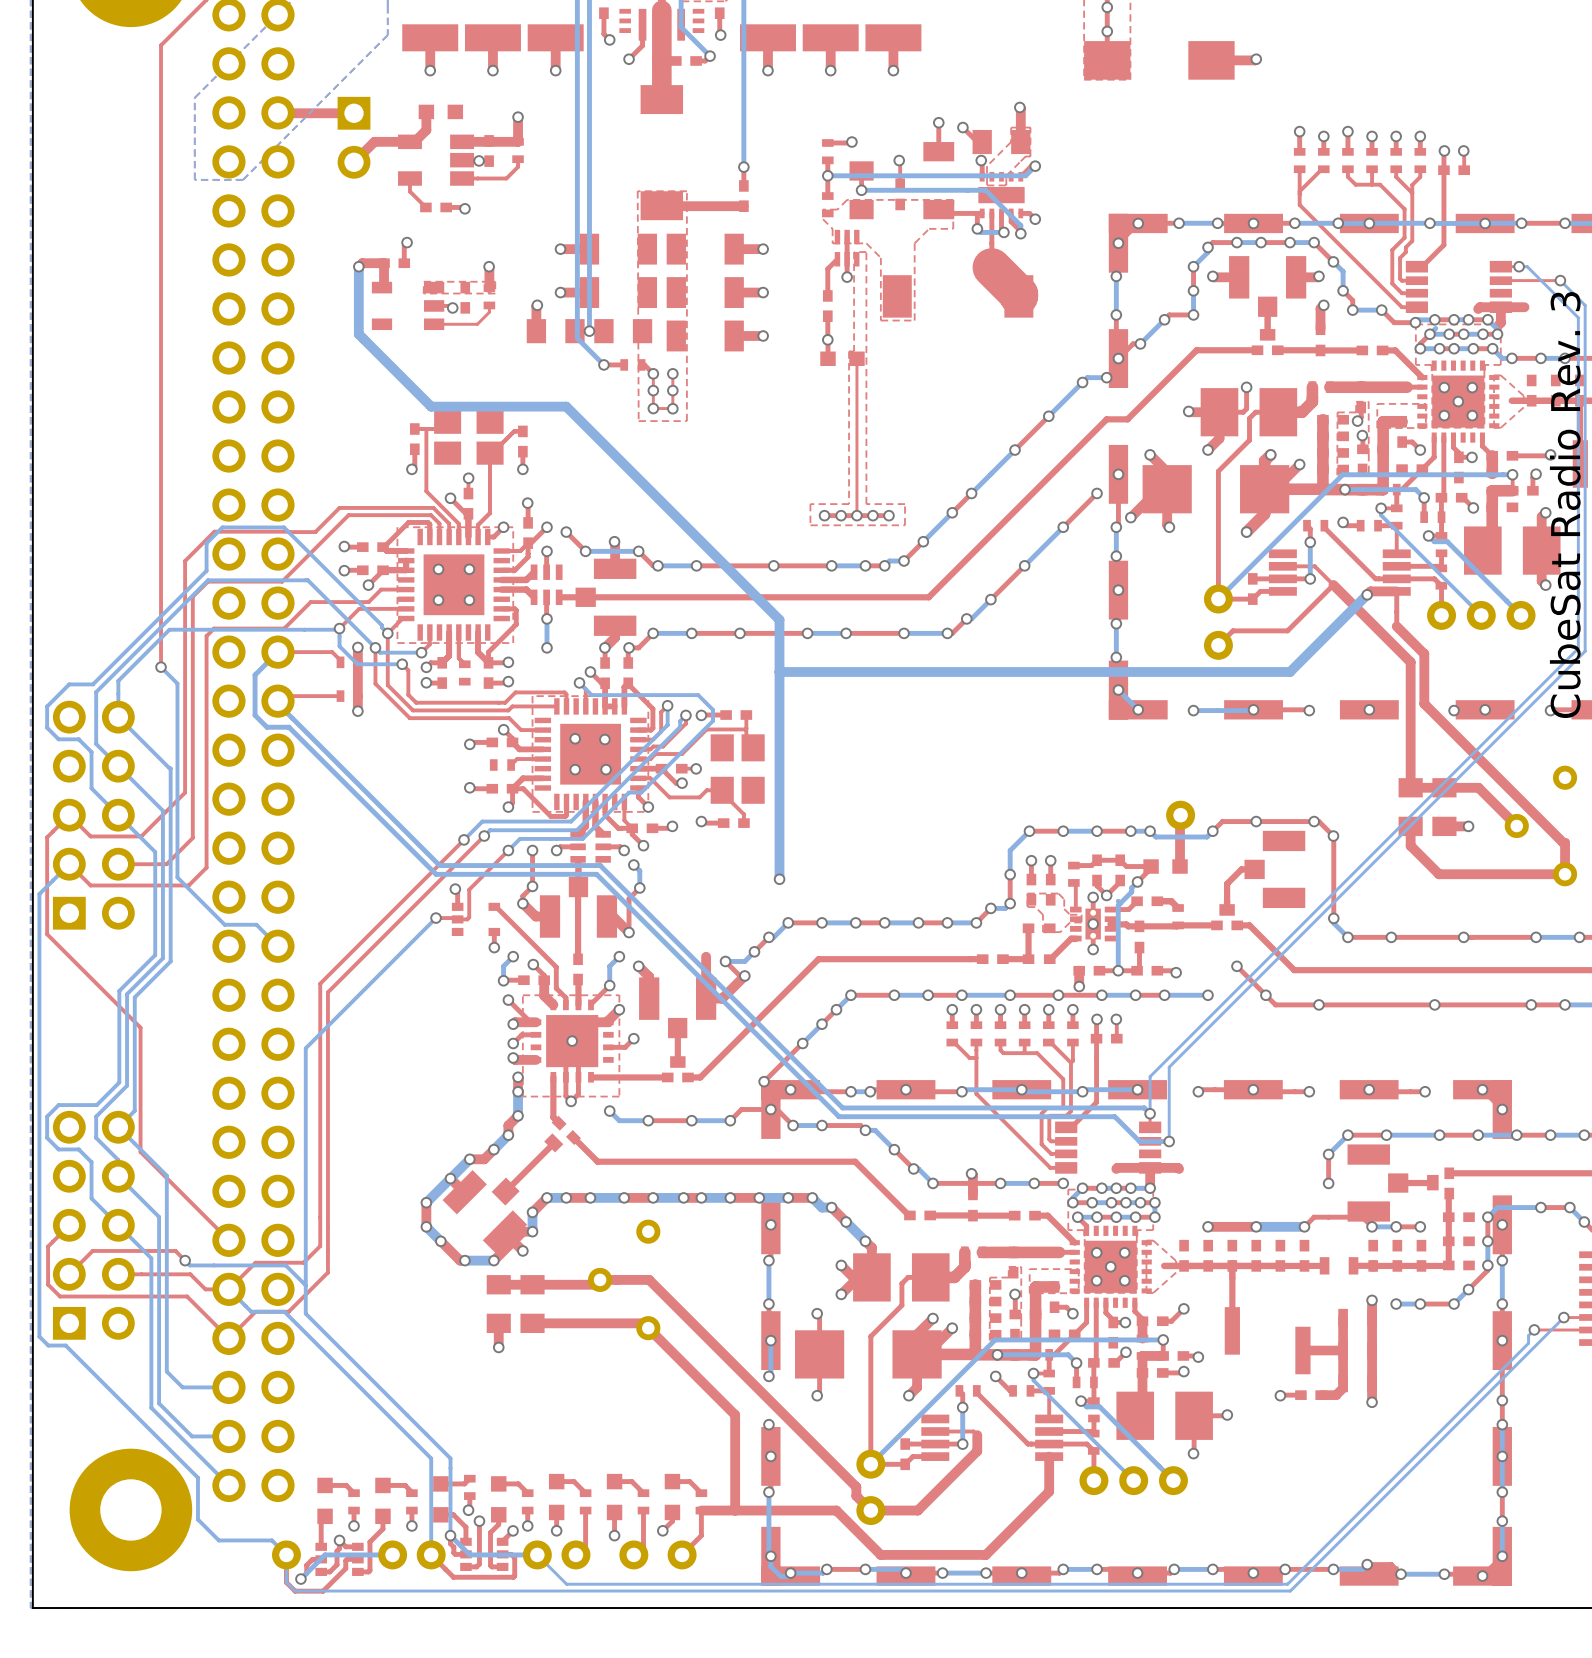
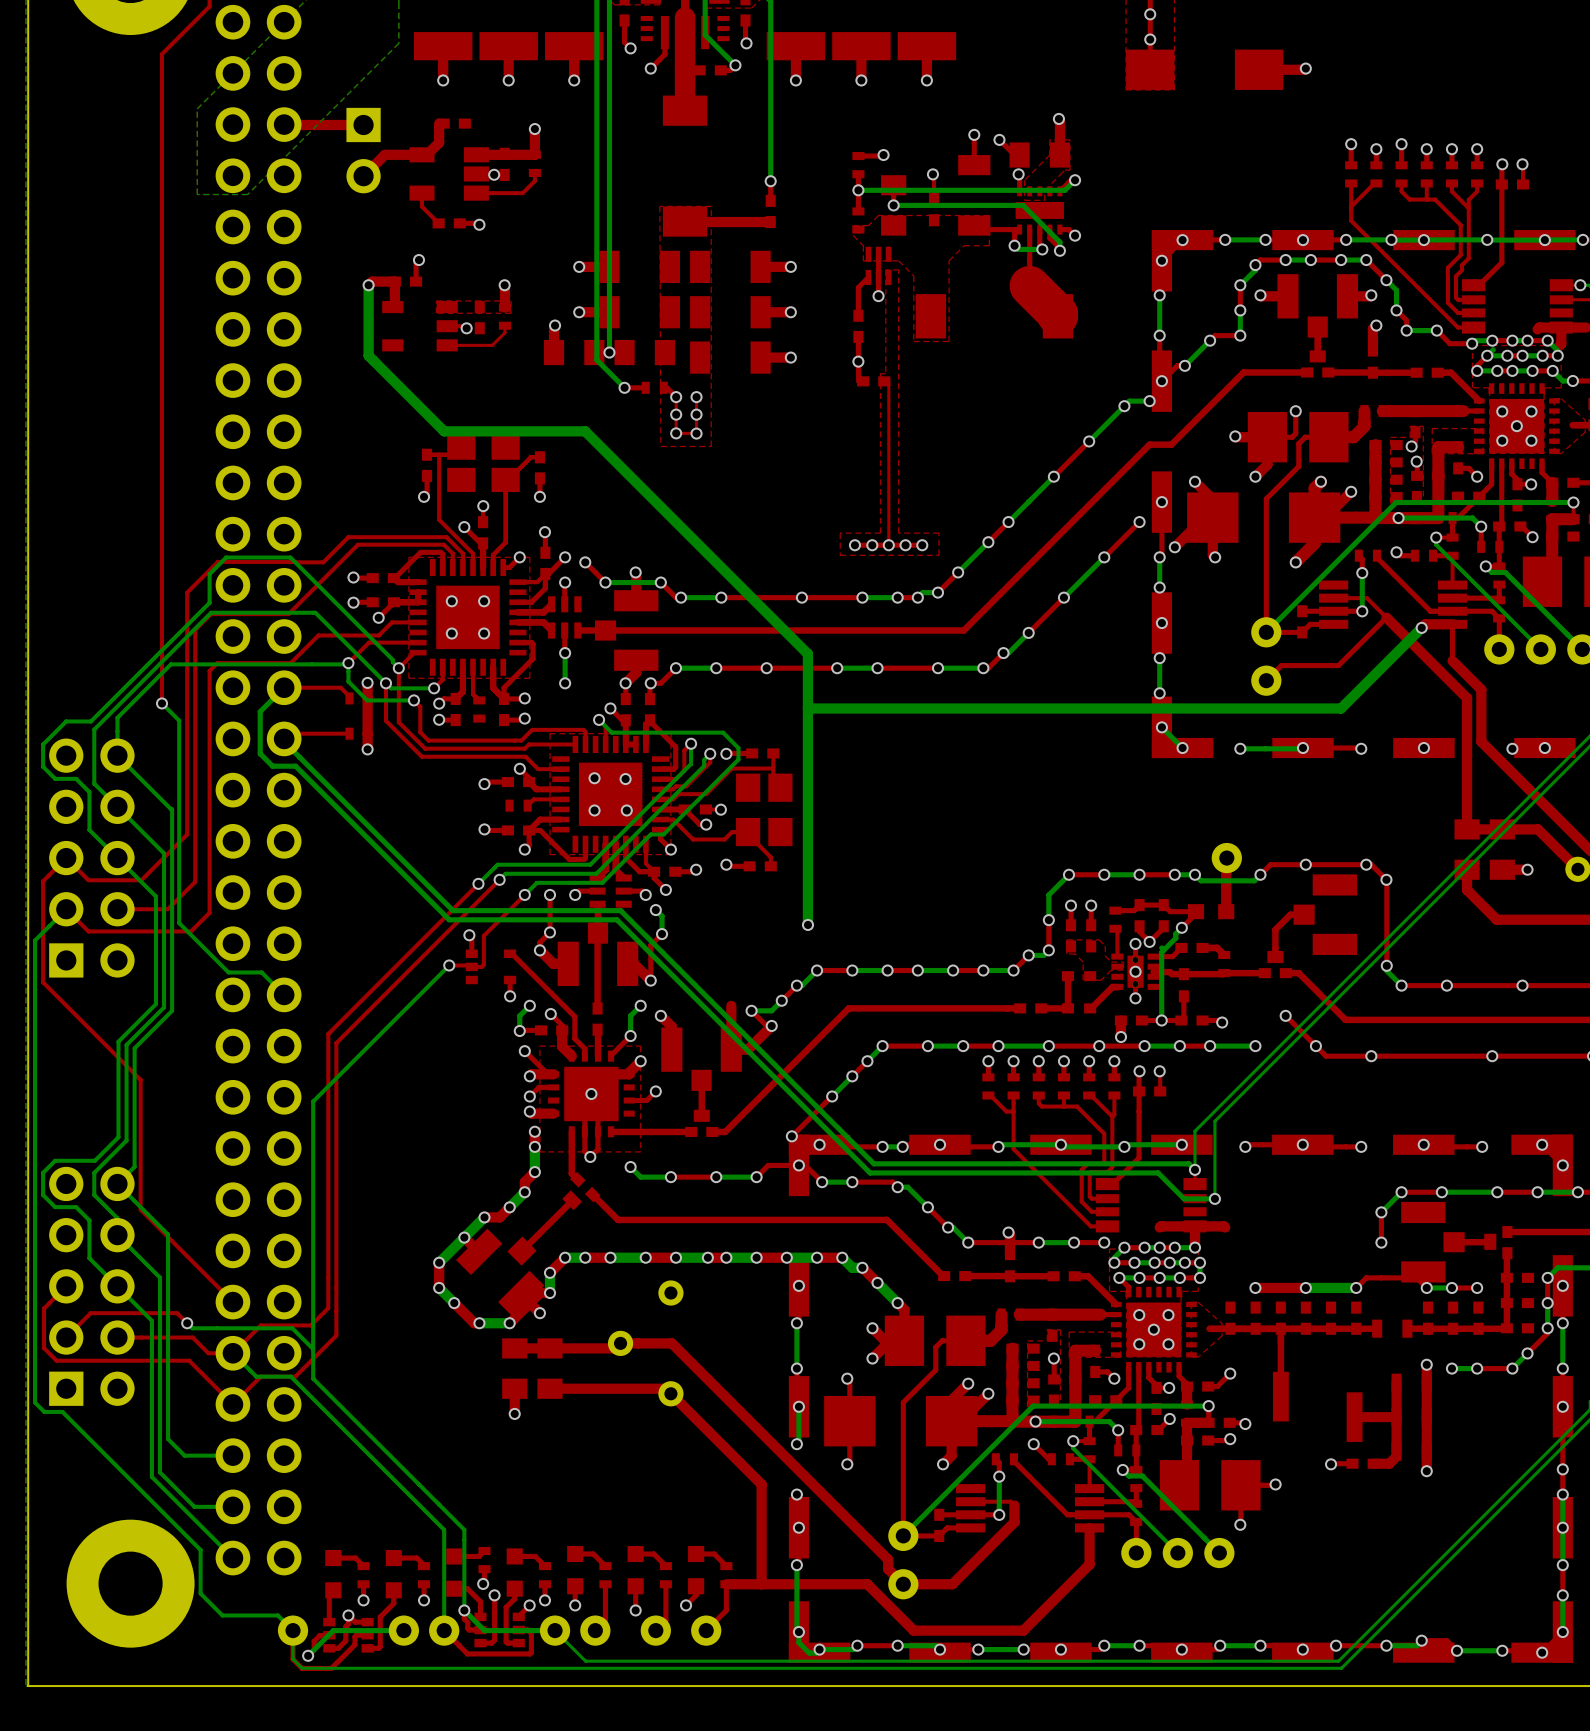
part footprint: [418, 104, 464, 120] -> [437, 118, 471, 129]
part footprint: [820, 351, 865, 366] -> [857, 376, 891, 387]

